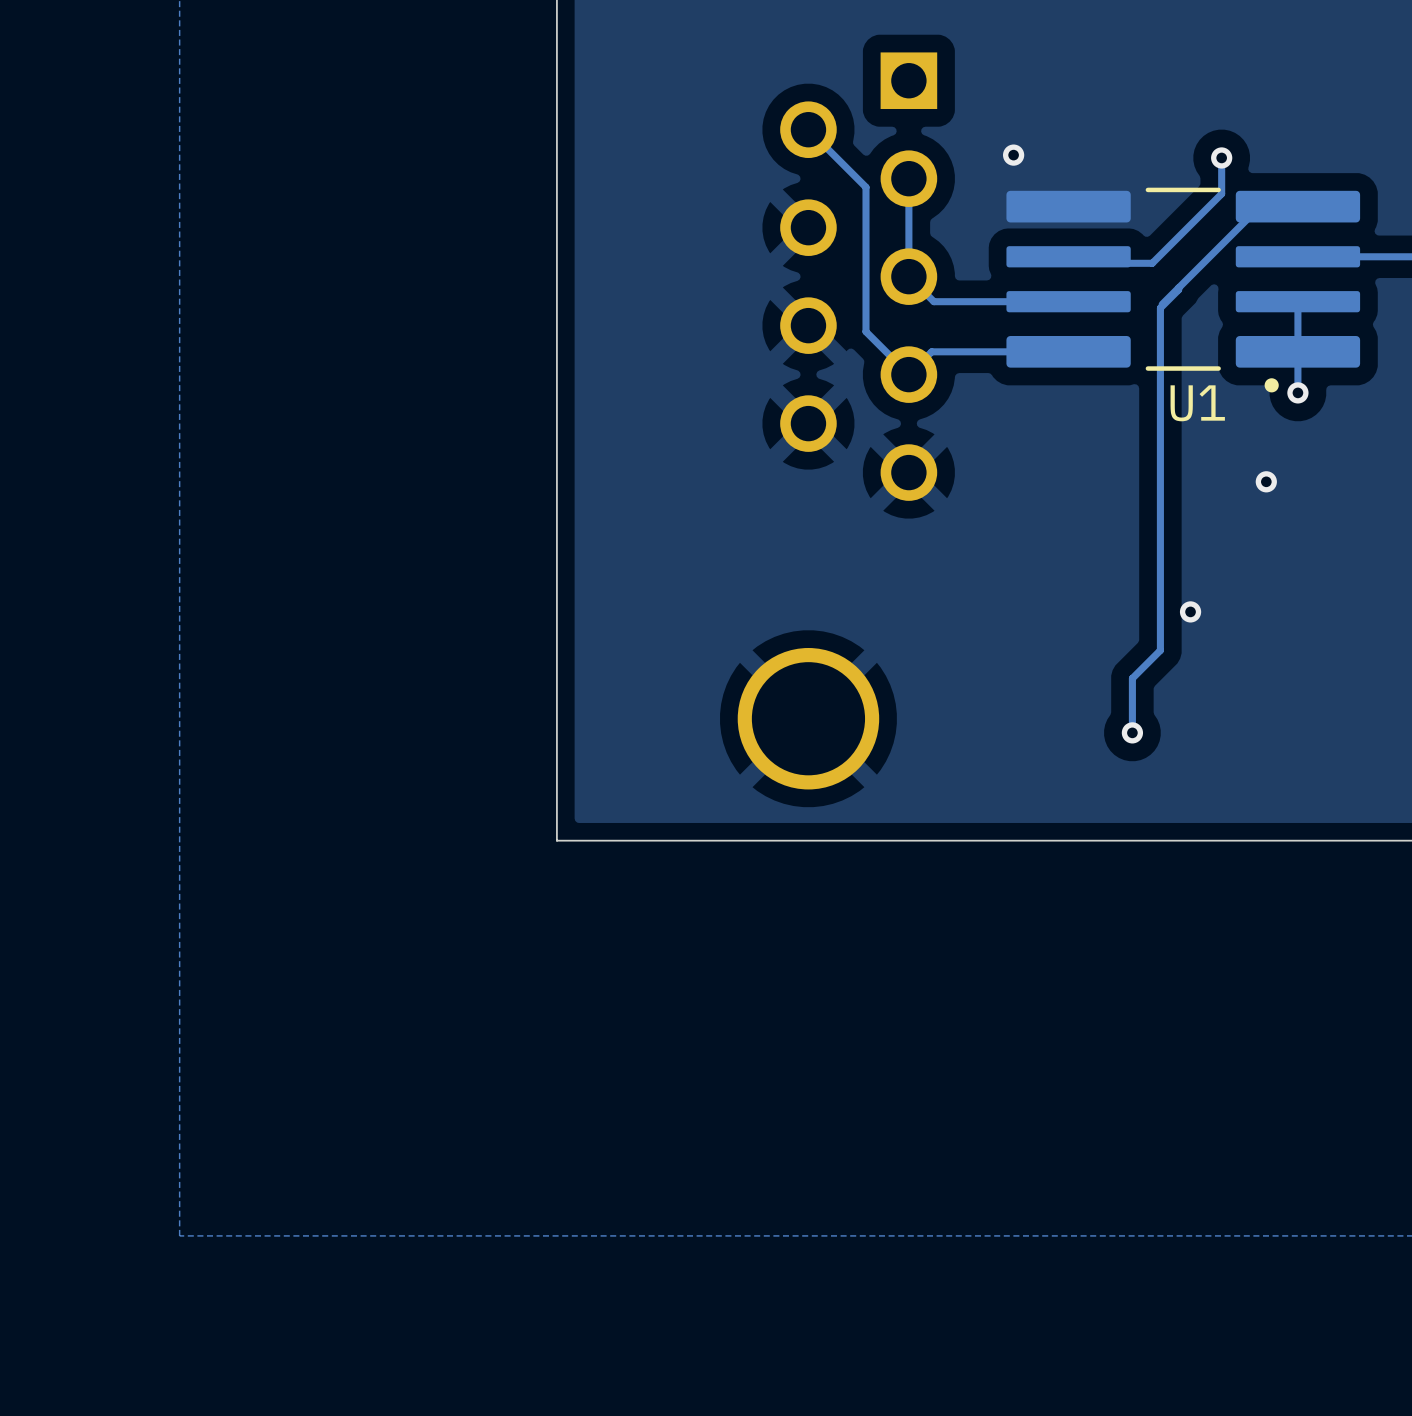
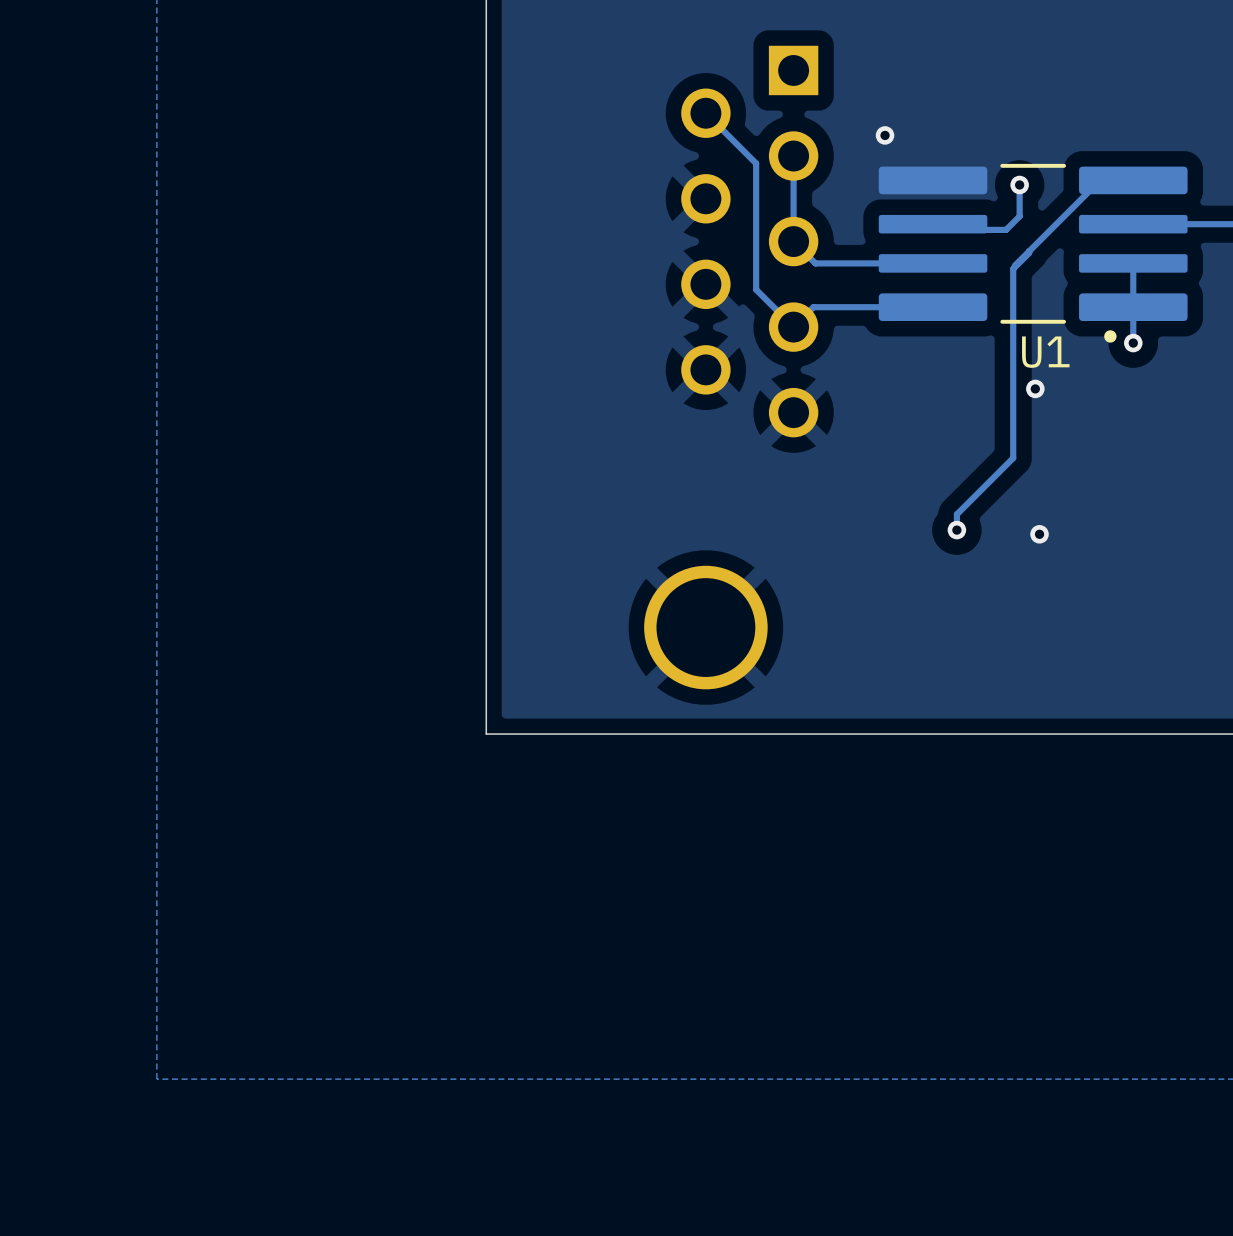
track: (1221, 157) (1221, 193) (1152, 263) -> (1019, 184) (1019, 216) (1006, 229)
via position: (1221, 157) -> (1019, 184)
via position: (1266, 481) -> (1035, 388)
track: (1160, 524) (1160, 650) (1132, 678) (1132, 732) -> (1013, 458) (956, 514) (956, 530)
via: none -> (956, 530)
via: (1132, 732) -> none

